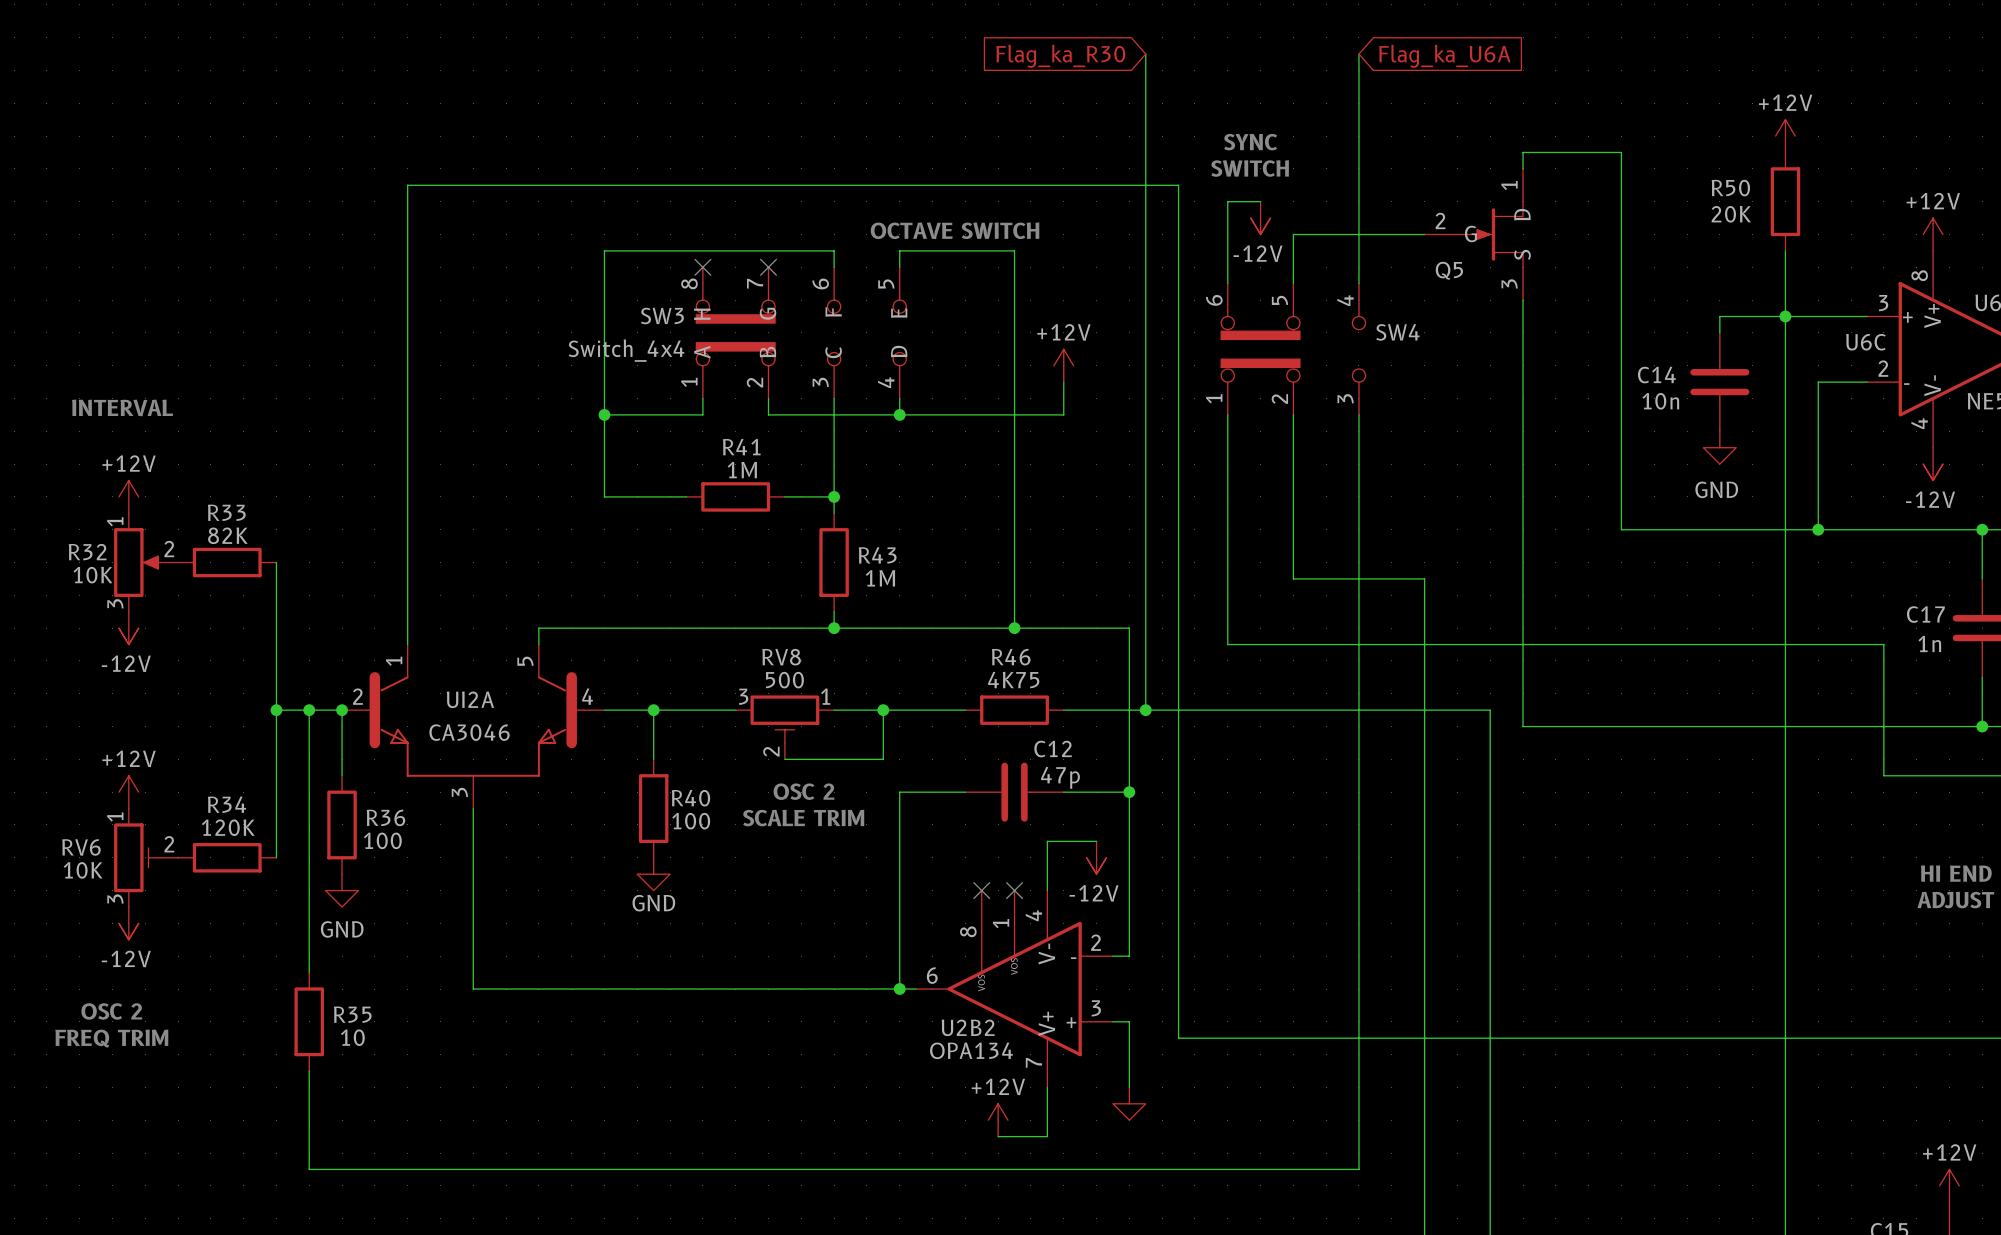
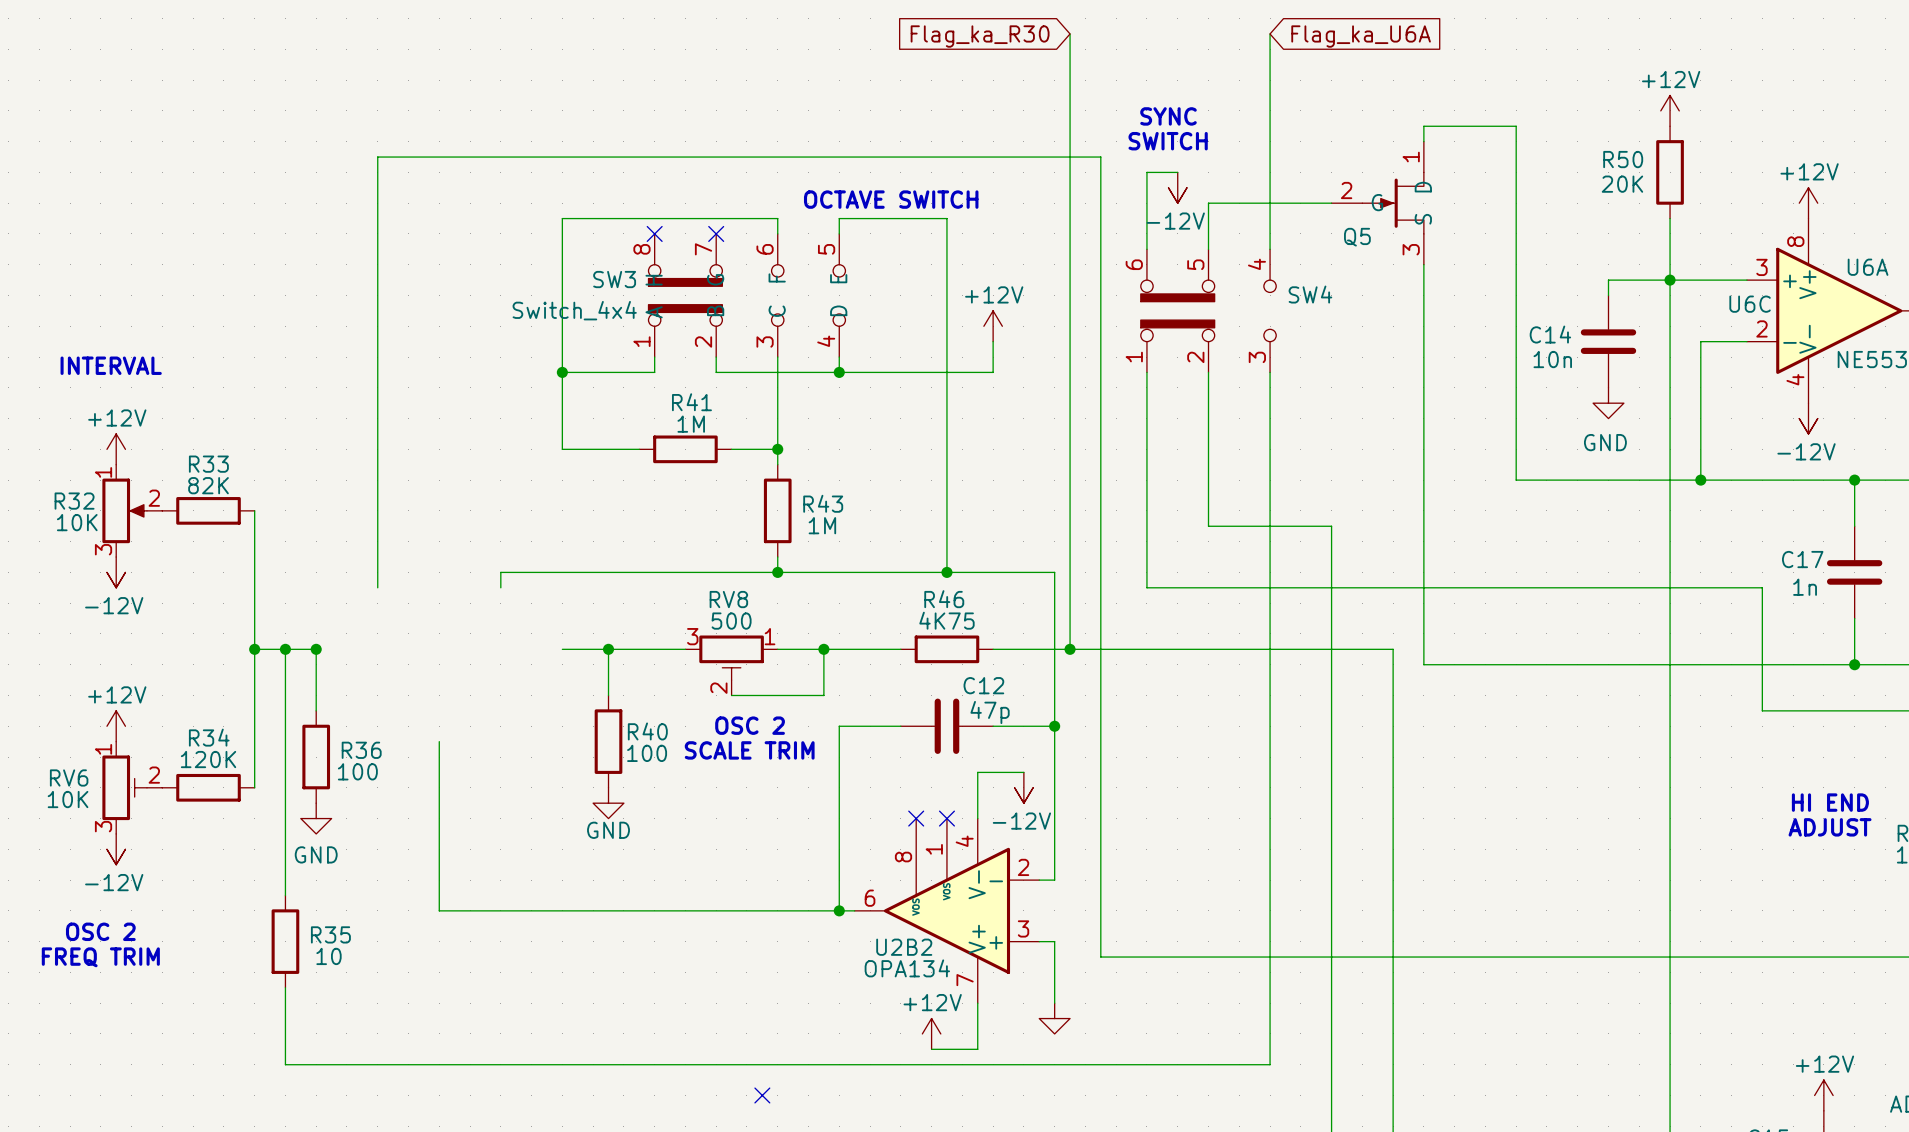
UI2A: CA3046 (473, 726) -> none
wire: (309, 1153) (309, 1169) (1358, 1169) (1358, 1153) -> (285, 1064) (1270, 1064)
no-connect mark: none -> (762, 1095)

